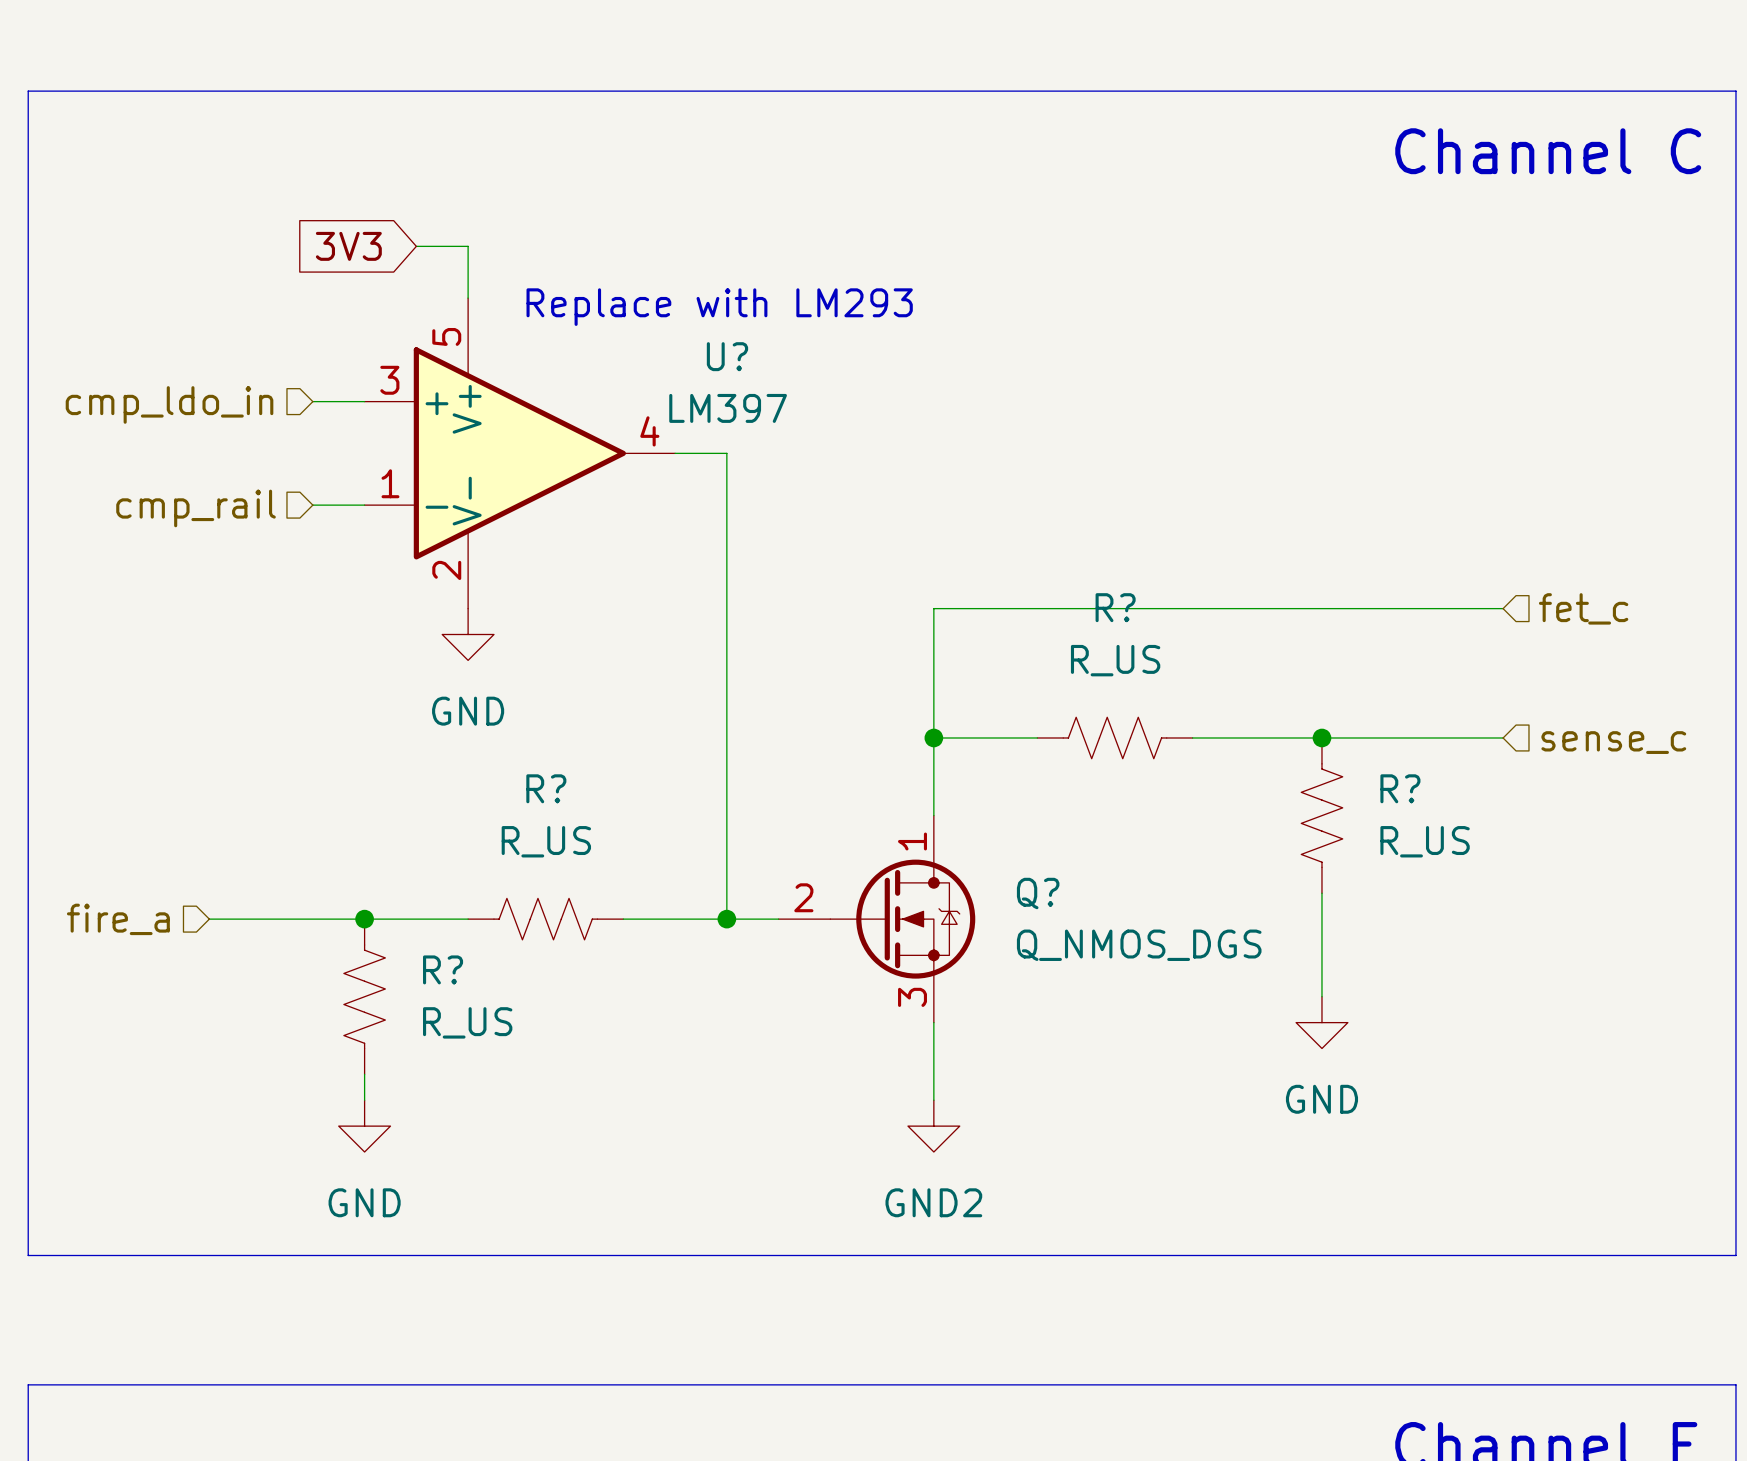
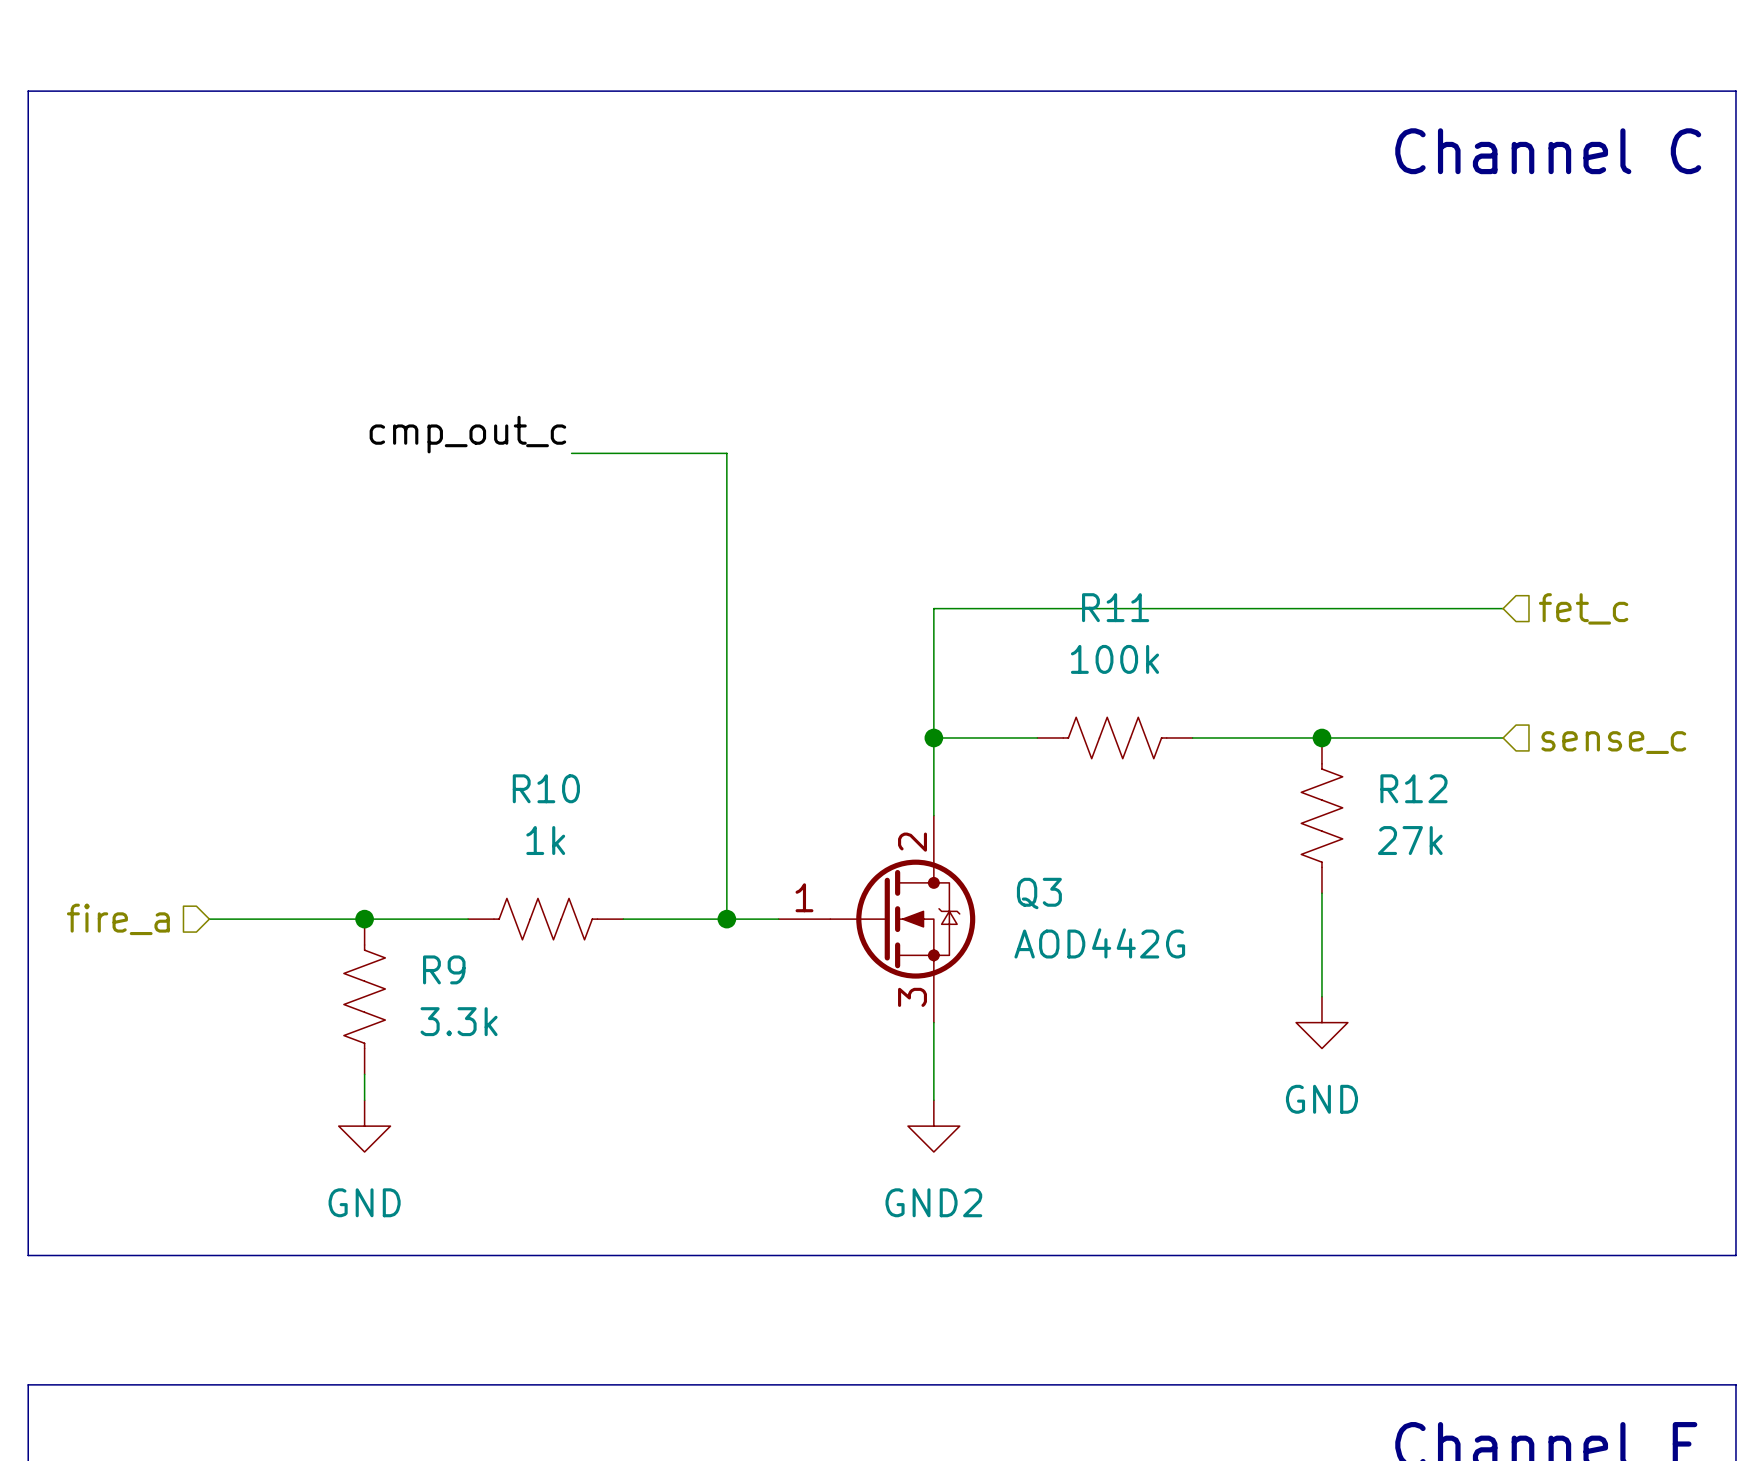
global label: 3V3 (348, 246) -> none
wire: (416, 246) (468, 246) (468, 298) -> none
text: Replace with LM293 (719, 307) -> none
wire: (312, 401) (364, 401) -> none
hierarchical label: cmp_ldo_in (169, 404) -> none
label: none -> cmp_out_c (467, 434)
U?: LM397 (519, 453) -> none
wire: (312, 505) (364, 505) -> none
hierarchical label: cmp_rail (196, 508) -> none
R? name: R? (1115, 607) -> R11 (1115, 607)
power symbol: GND (468, 634) -> none
R? value: R_US (1115, 660) -> 100k (1114, 659)
R? name: R? (546, 788) -> R10 (546, 788)
R? name: R? (1400, 788) -> R12 (1413, 788)
R? value: R_US (546, 841) -> 1k (545, 840)
Q? pin number: 1 (912, 841) -> 2 (912, 842)
R? value: R_US (1425, 841) -> 27k (1410, 840)
Q? name: Q? (1038, 893) -> Q3 (1039, 893)
Q? pin number: 2 (803, 897) -> 1 (804, 897)
Q? value: Q_NMOS_DGS (1139, 945) -> AOD442G (1099, 943)
R? name: R? (443, 969) -> R9 (444, 969)
R? value: R_US (467, 1022) -> 3.3k (459, 1021)

